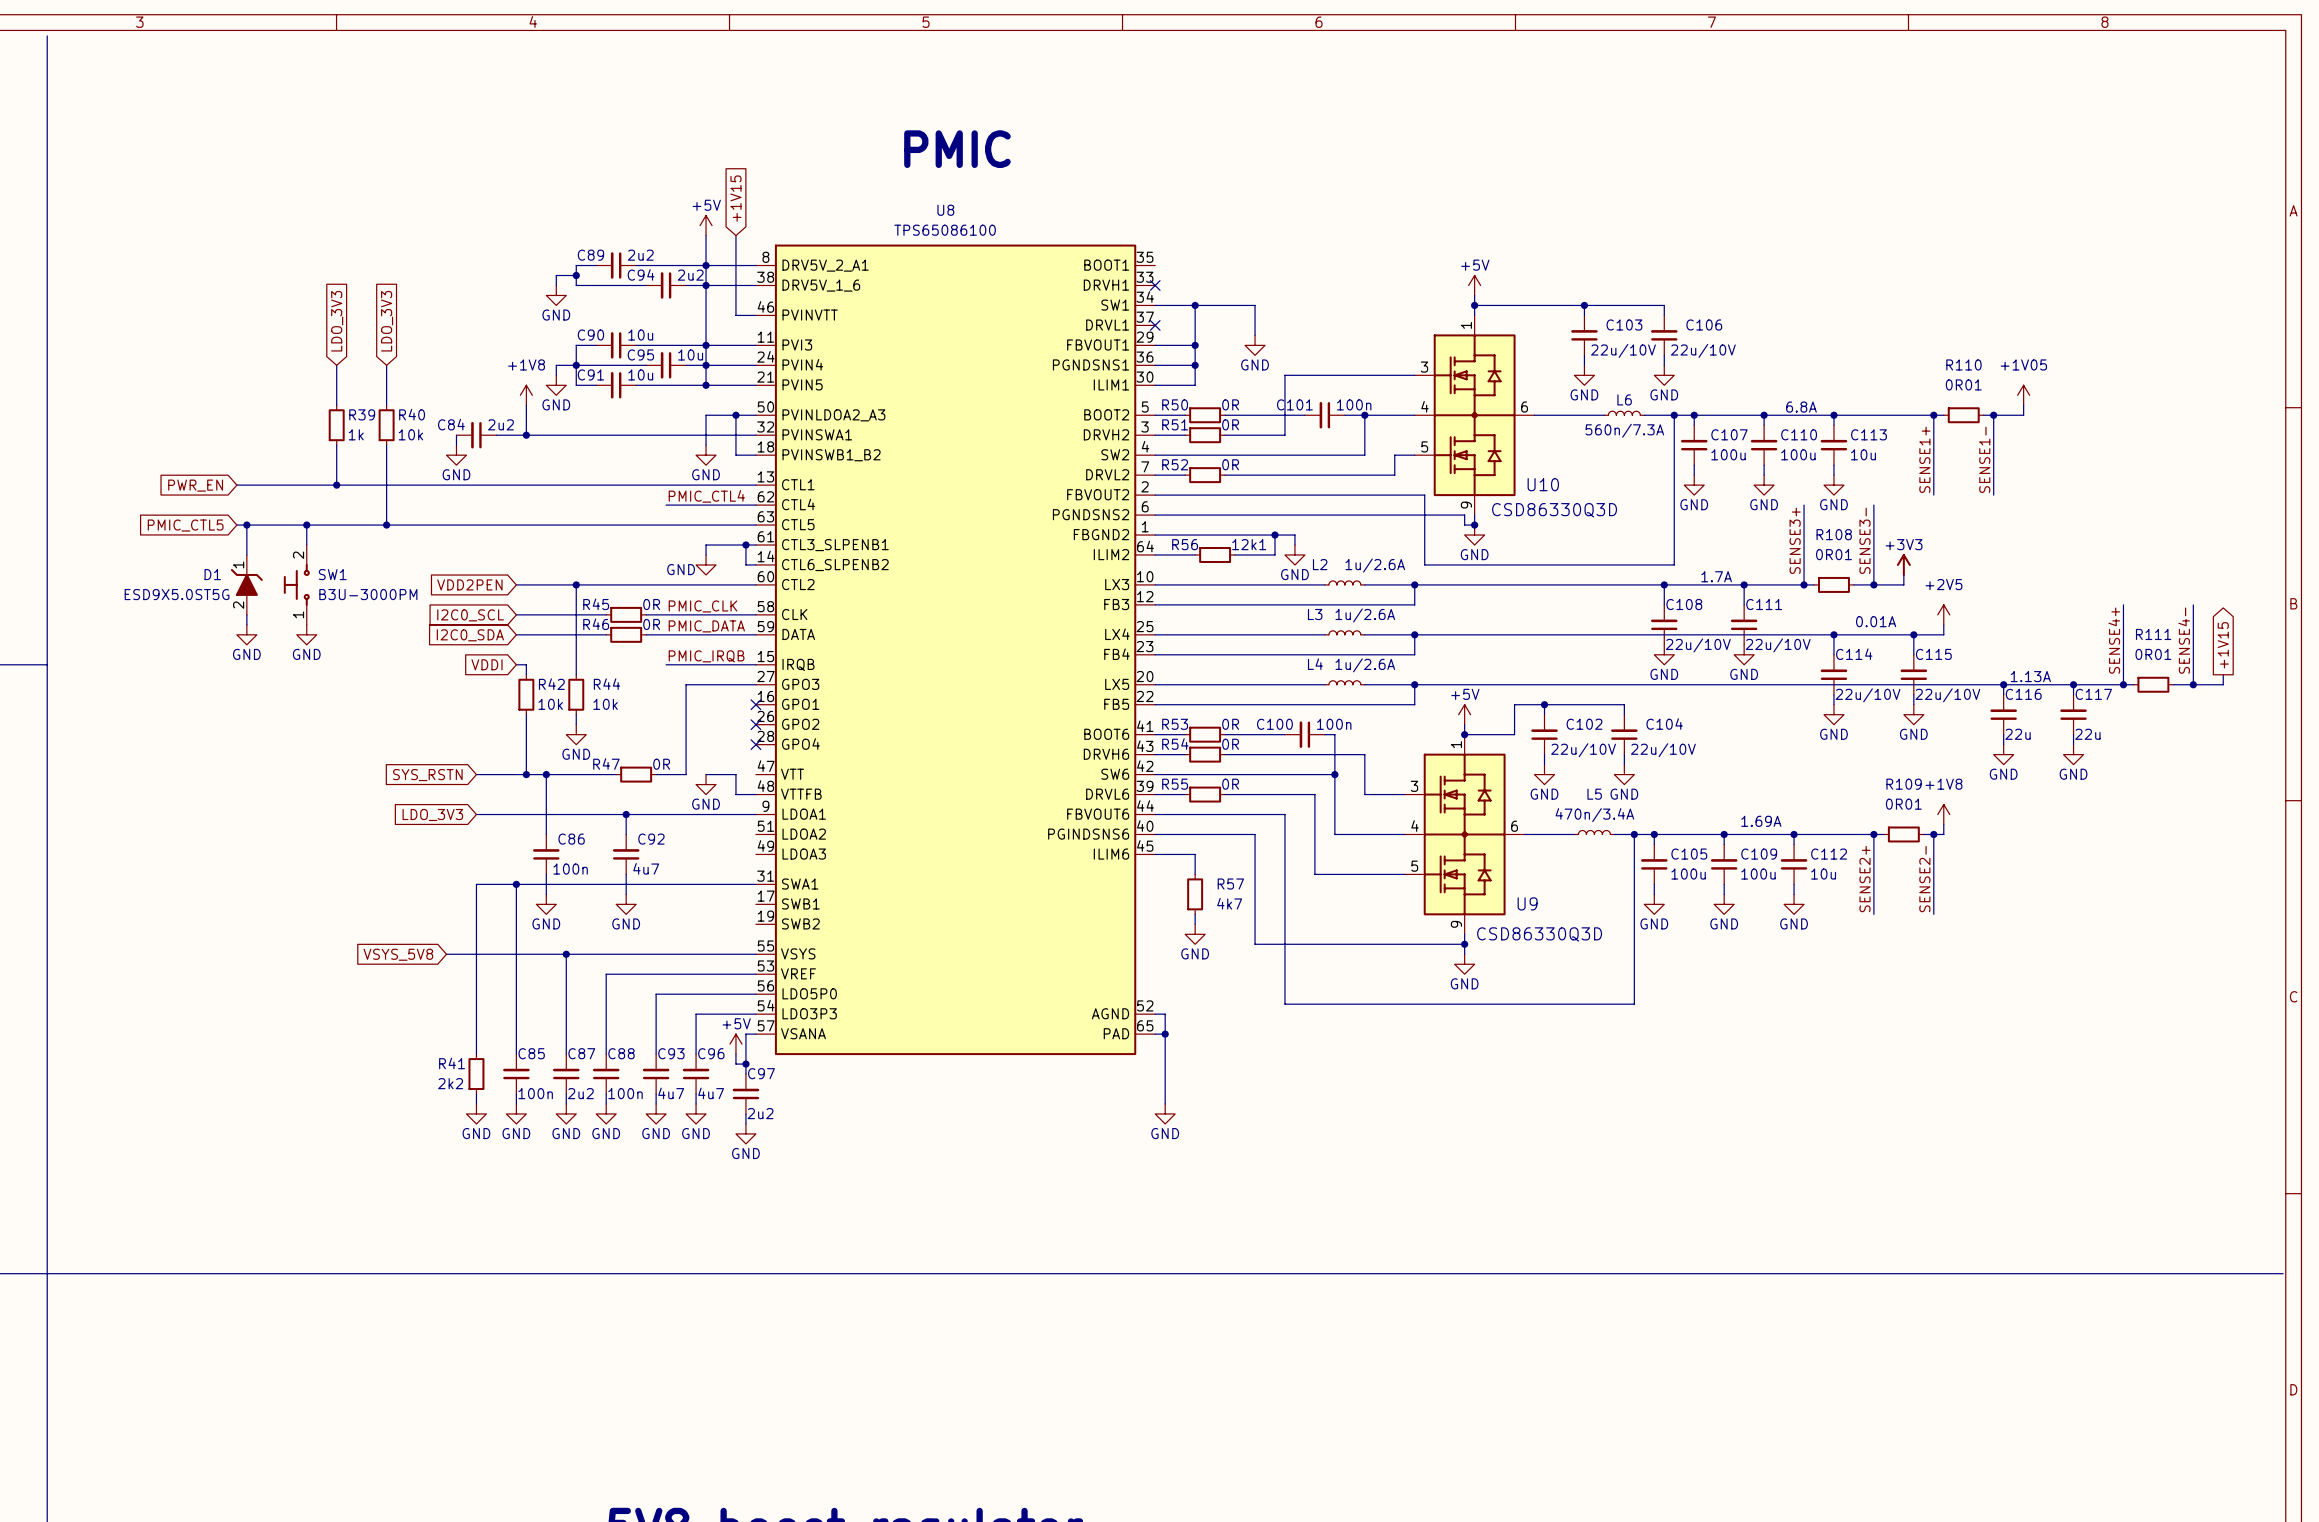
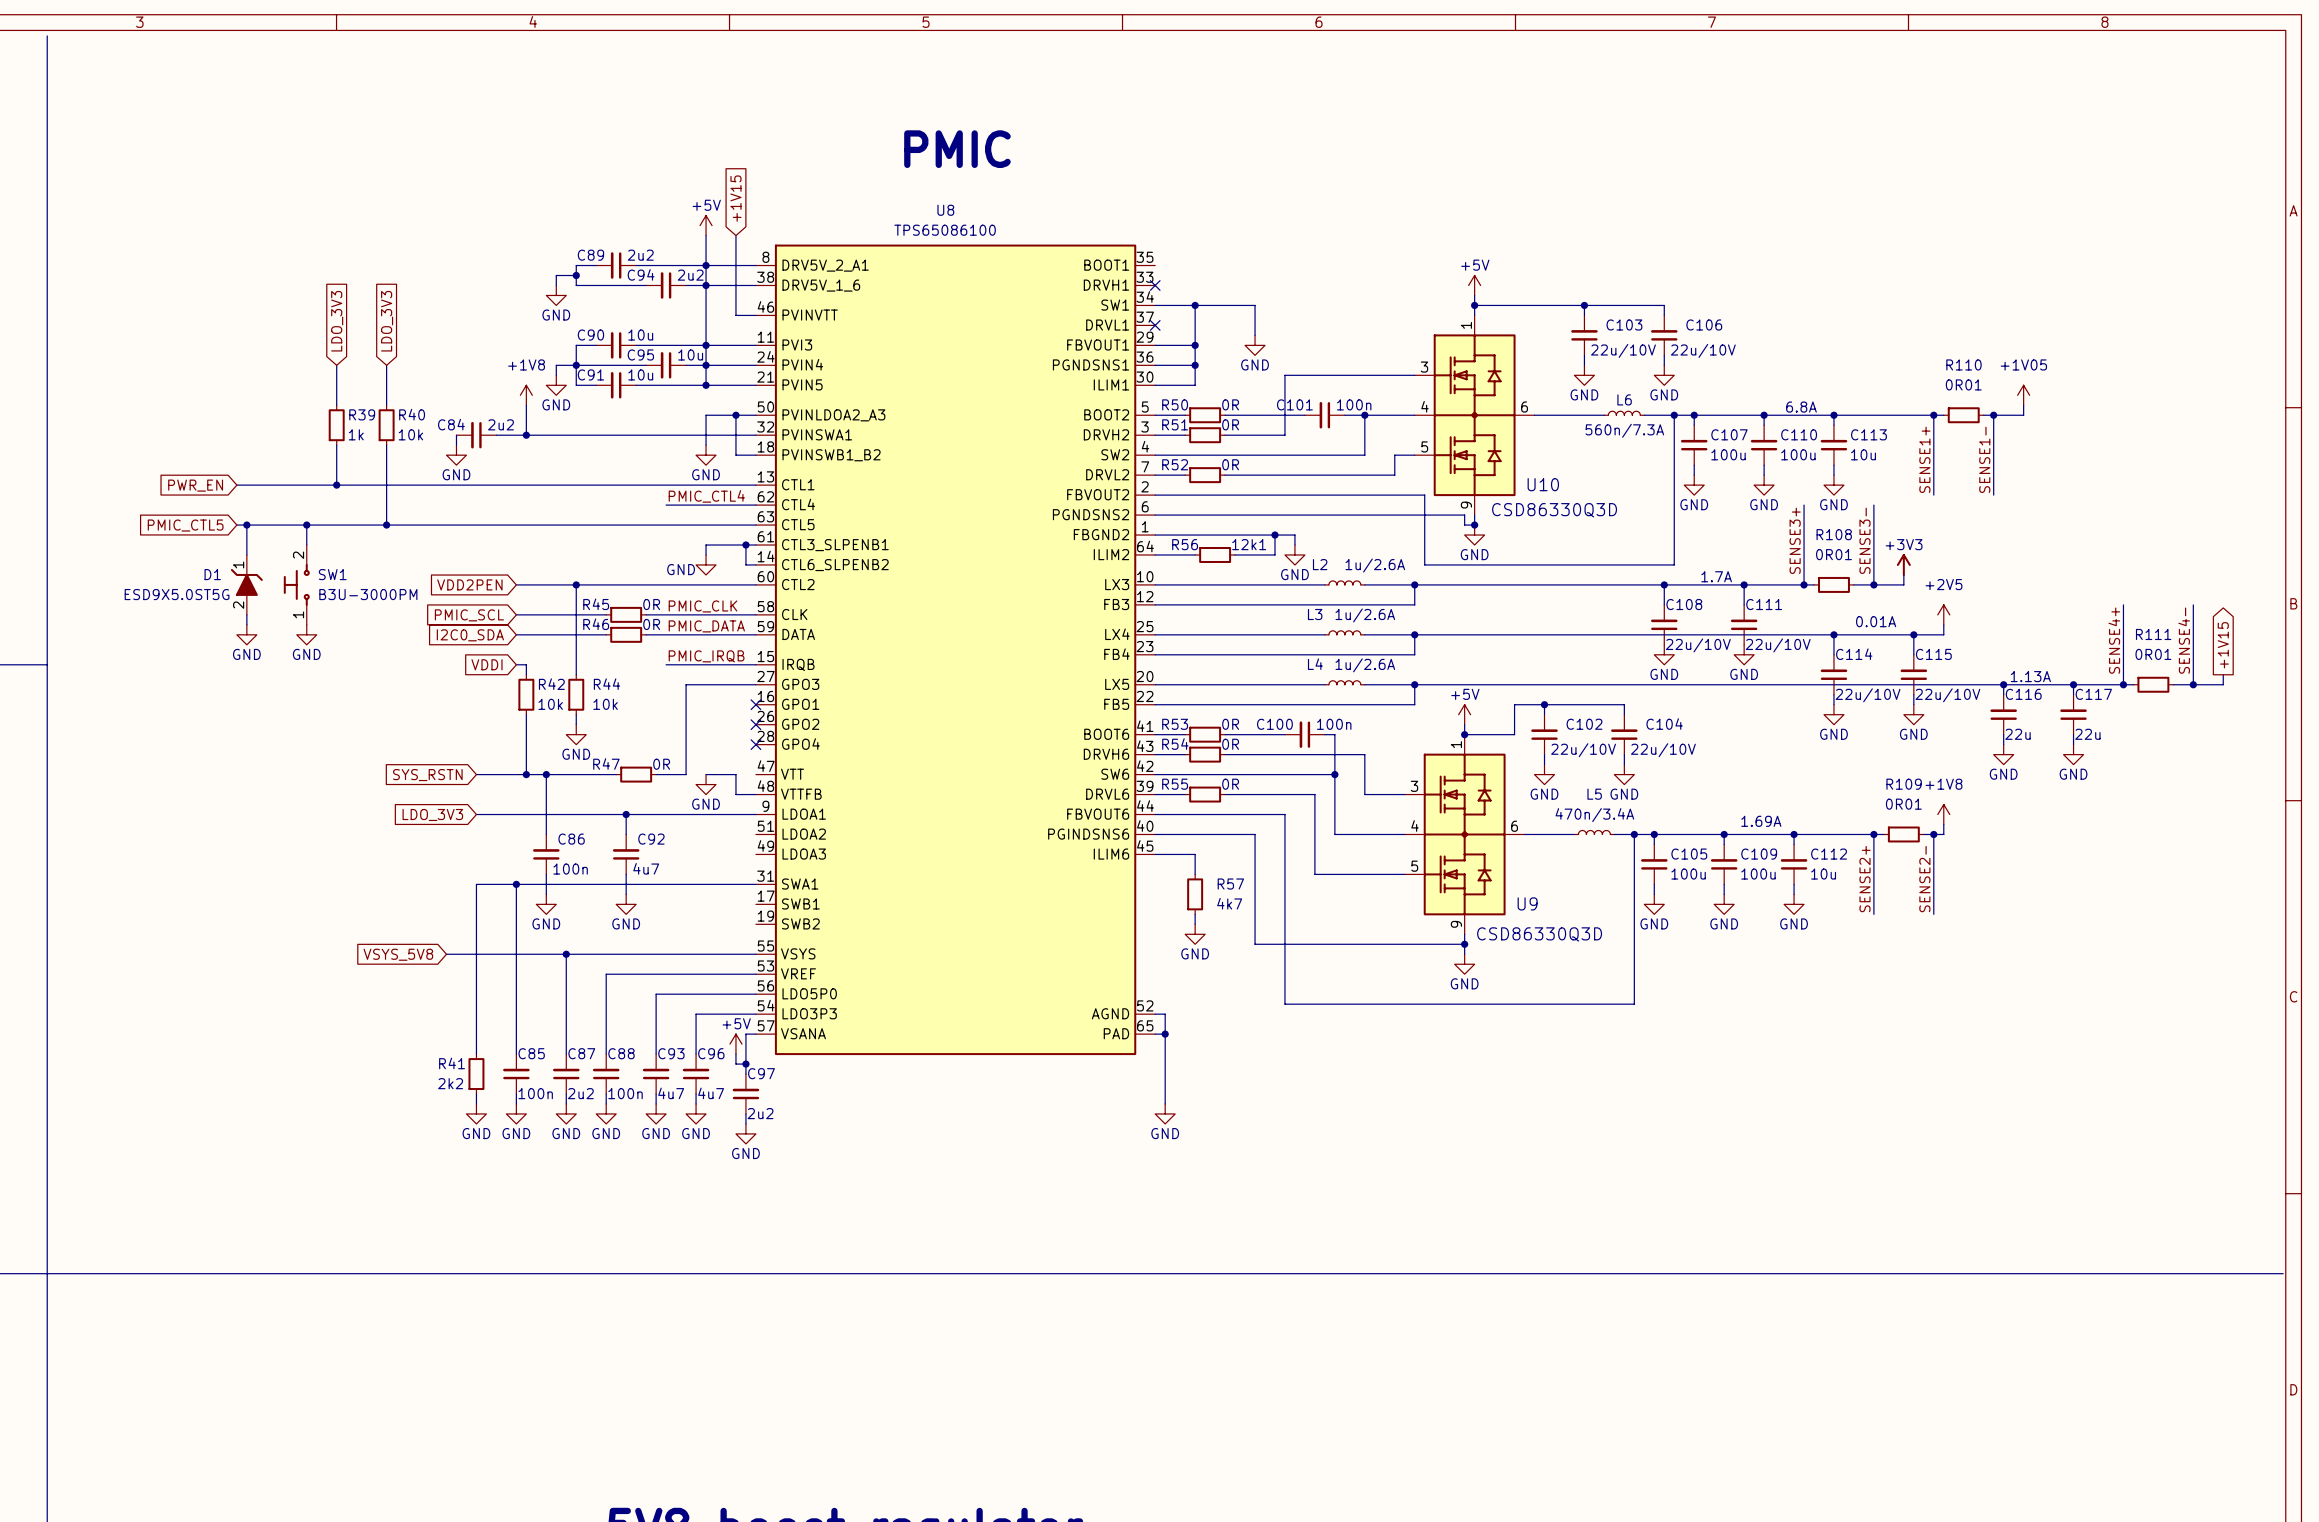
global label: I2C0_SCL (470, 615) -> PMIC_SCL (469, 615)

